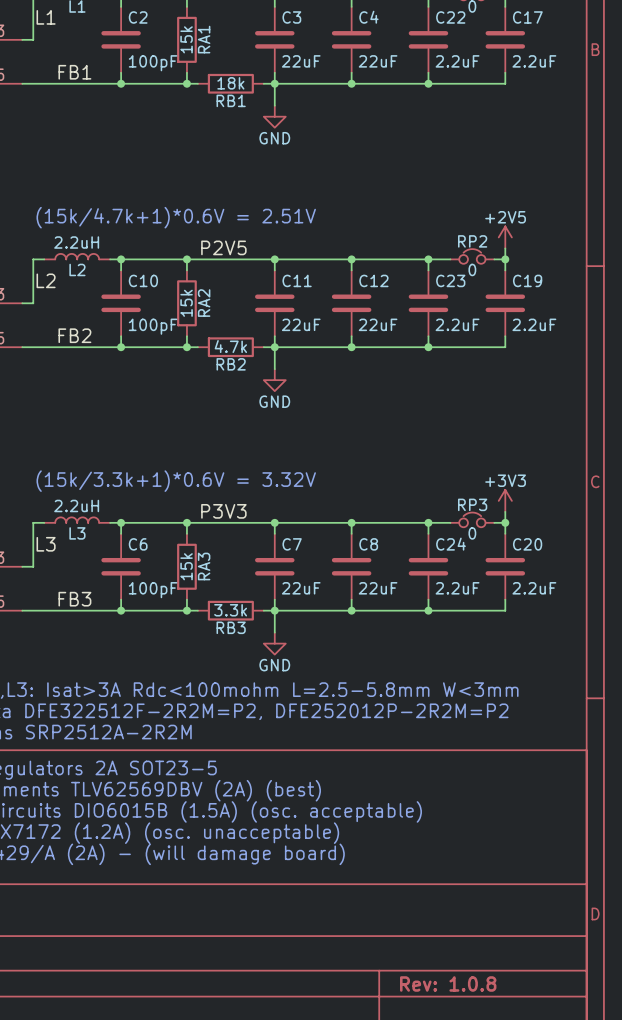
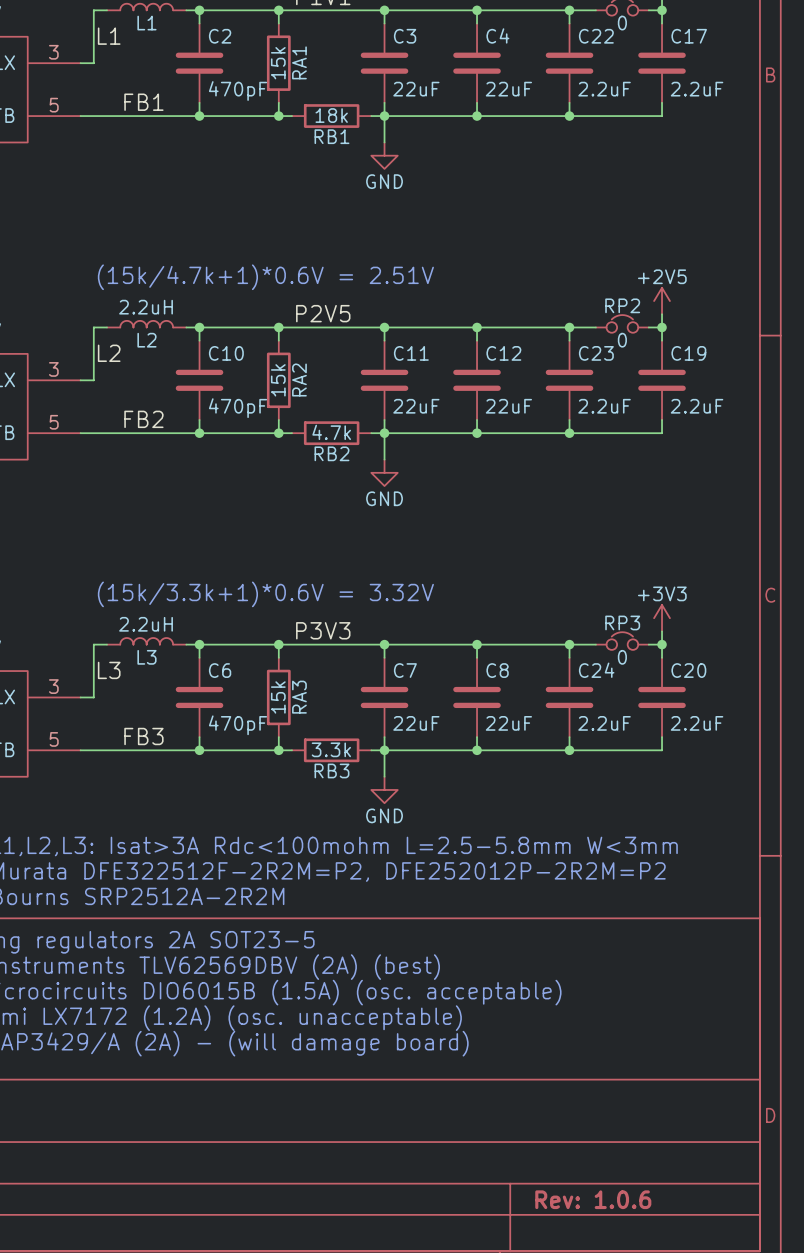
C2 value: 100pF (153, 63) -> 470pF (238, 91)
C10 value: 100pF (153, 326) -> 470pF (238, 408)
C6 value: 100pF (153, 590) -> 470pF (238, 725)
title block: Rev: 1.0.8 (448, 983) -> Rev: 1.0.6 (593, 1199)

